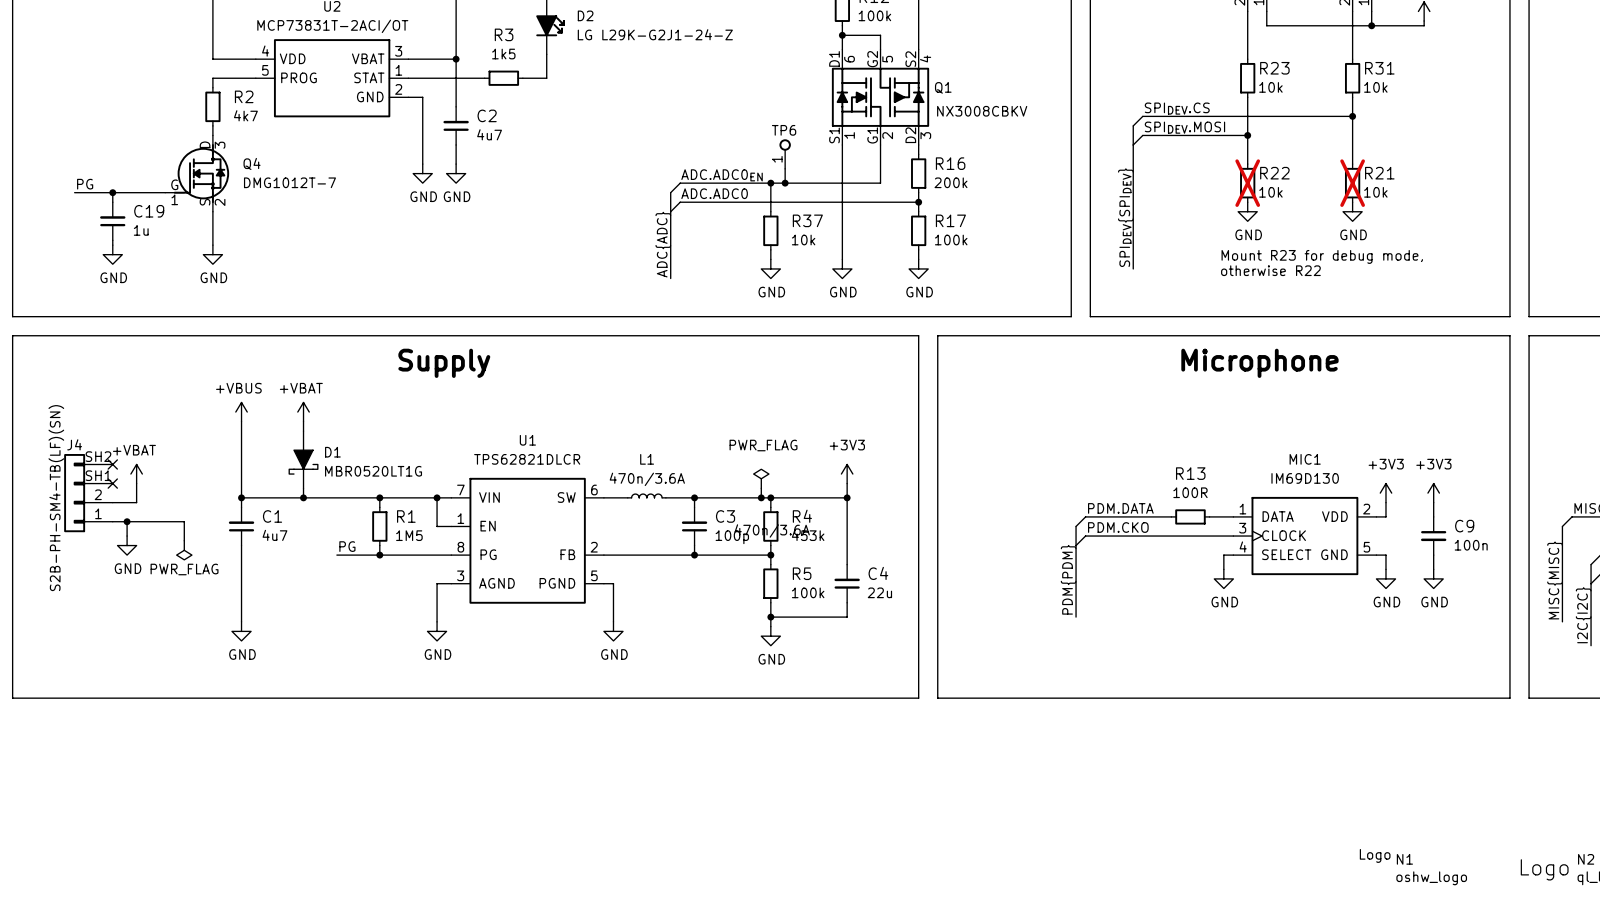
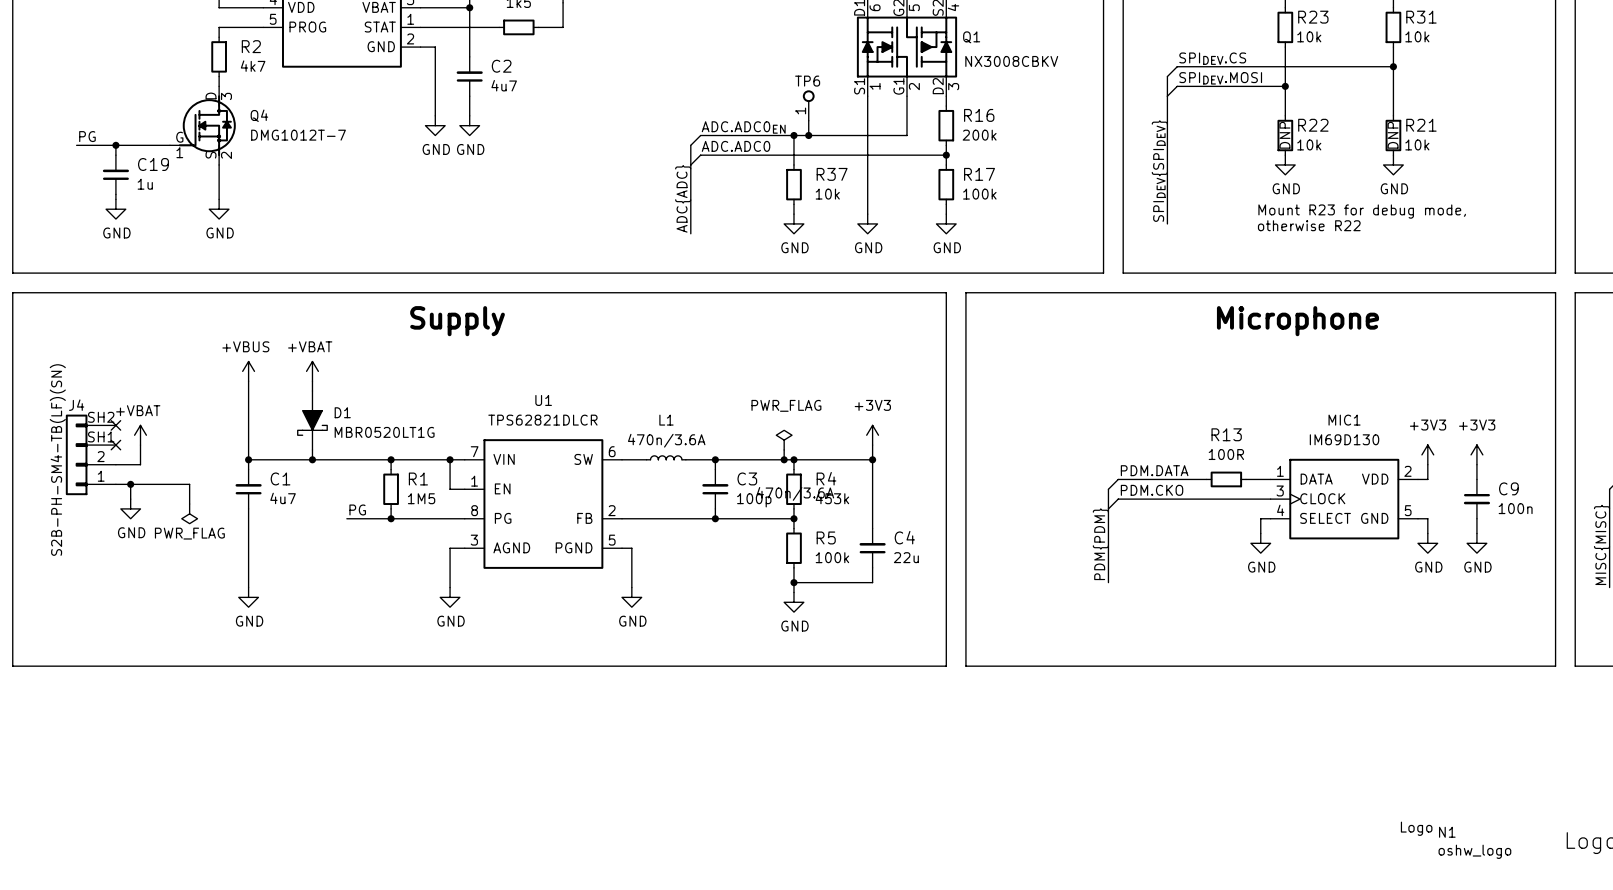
R22 text: none -> DNP (1284, 135)
R21 text: none -> DNP (1393, 135)
R22 do-not-place cross: (1247, 183) -> none
R21 do-not-place cross: (1352, 183) -> none

